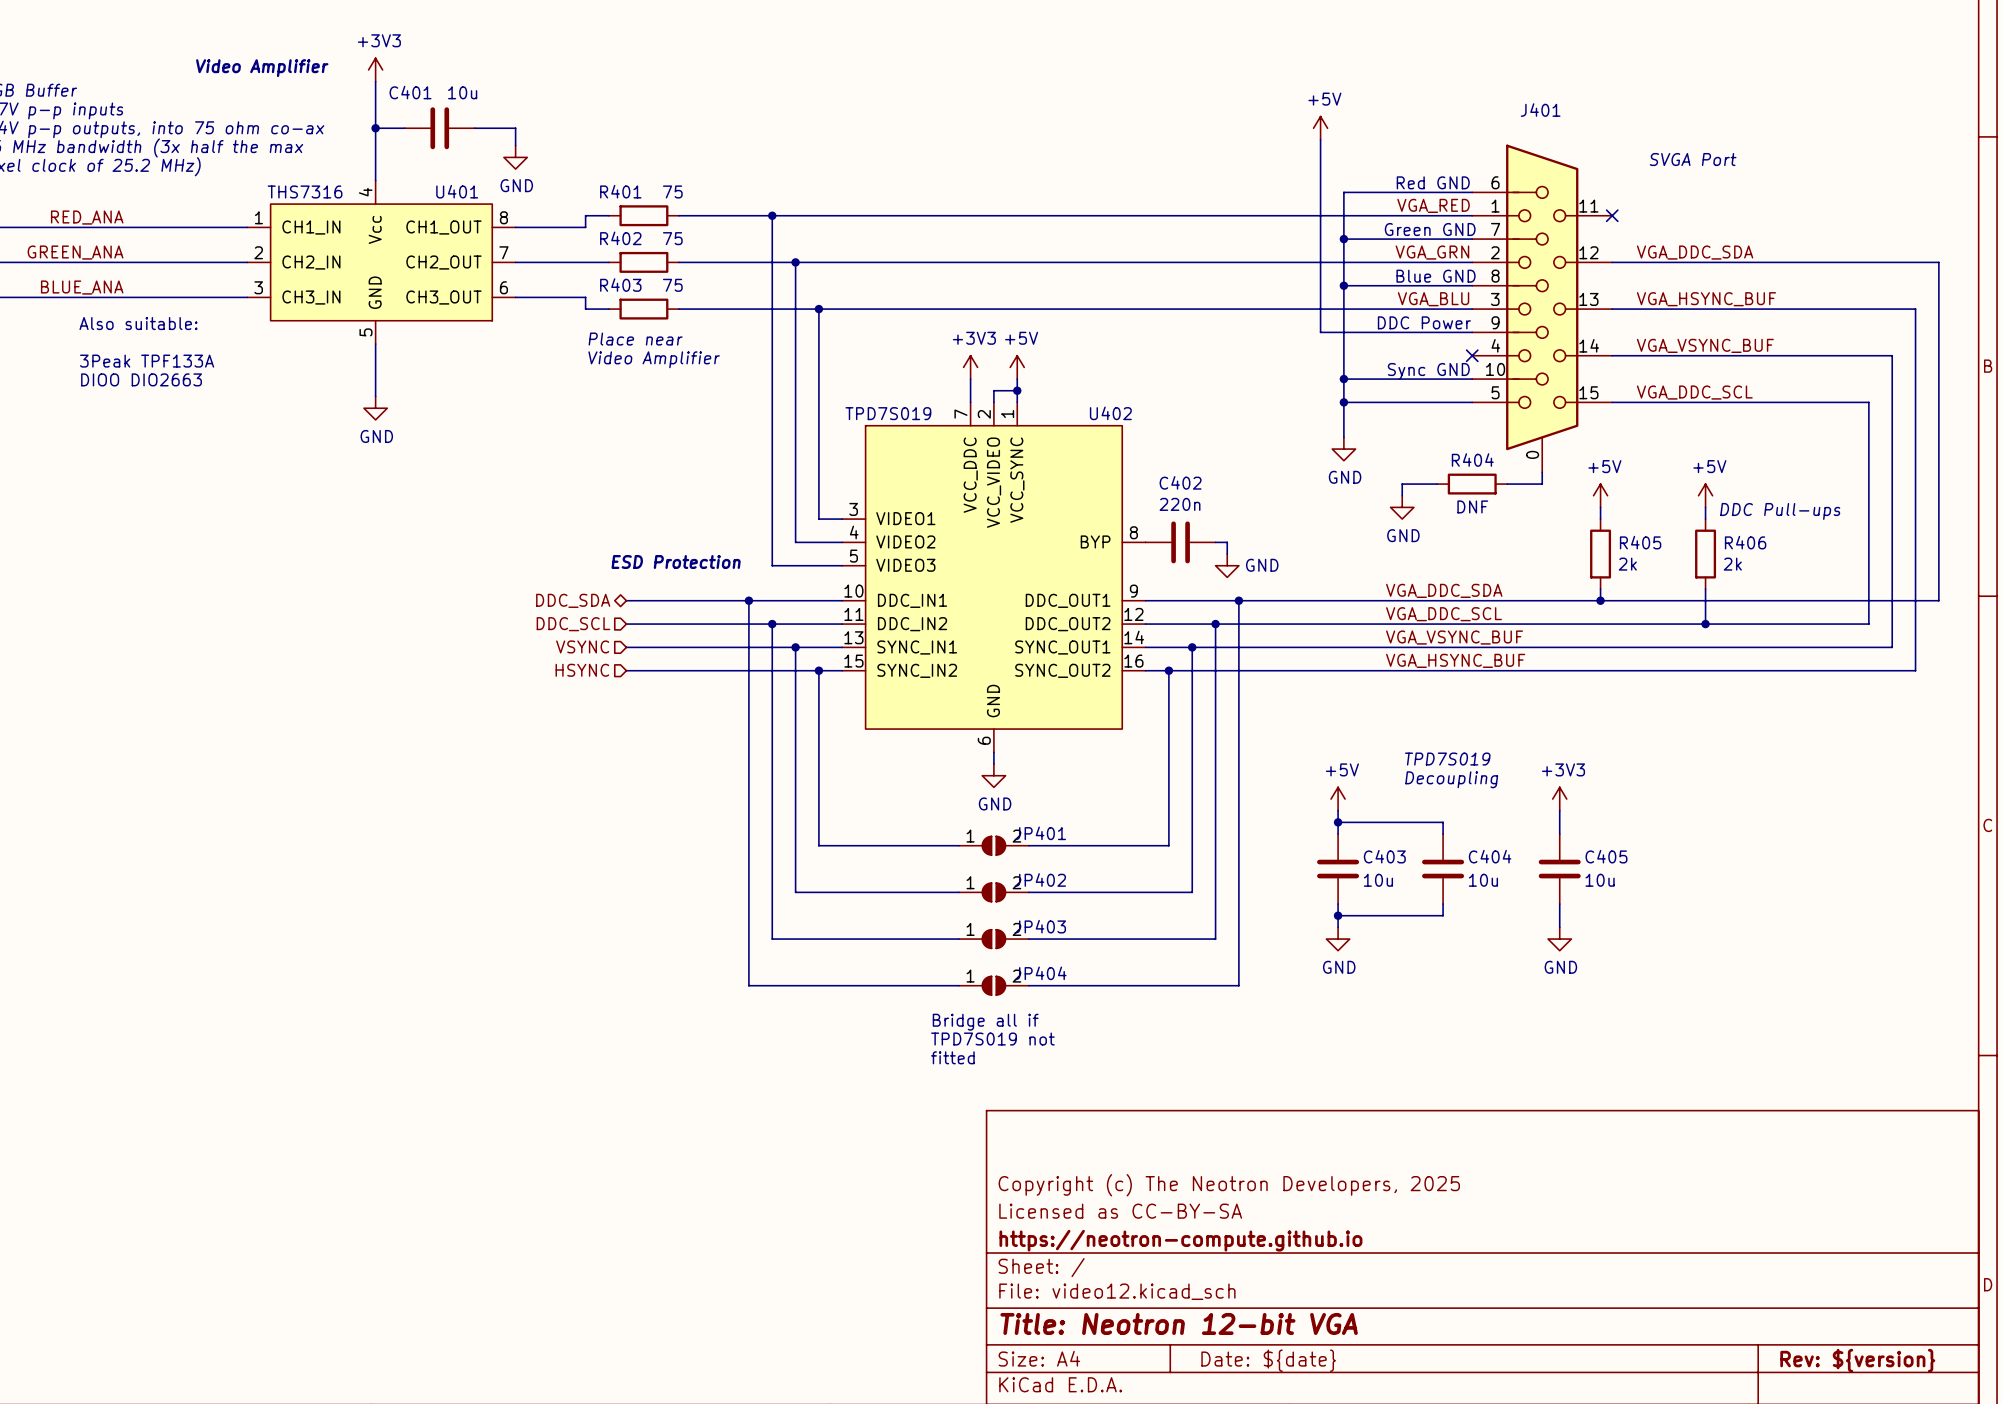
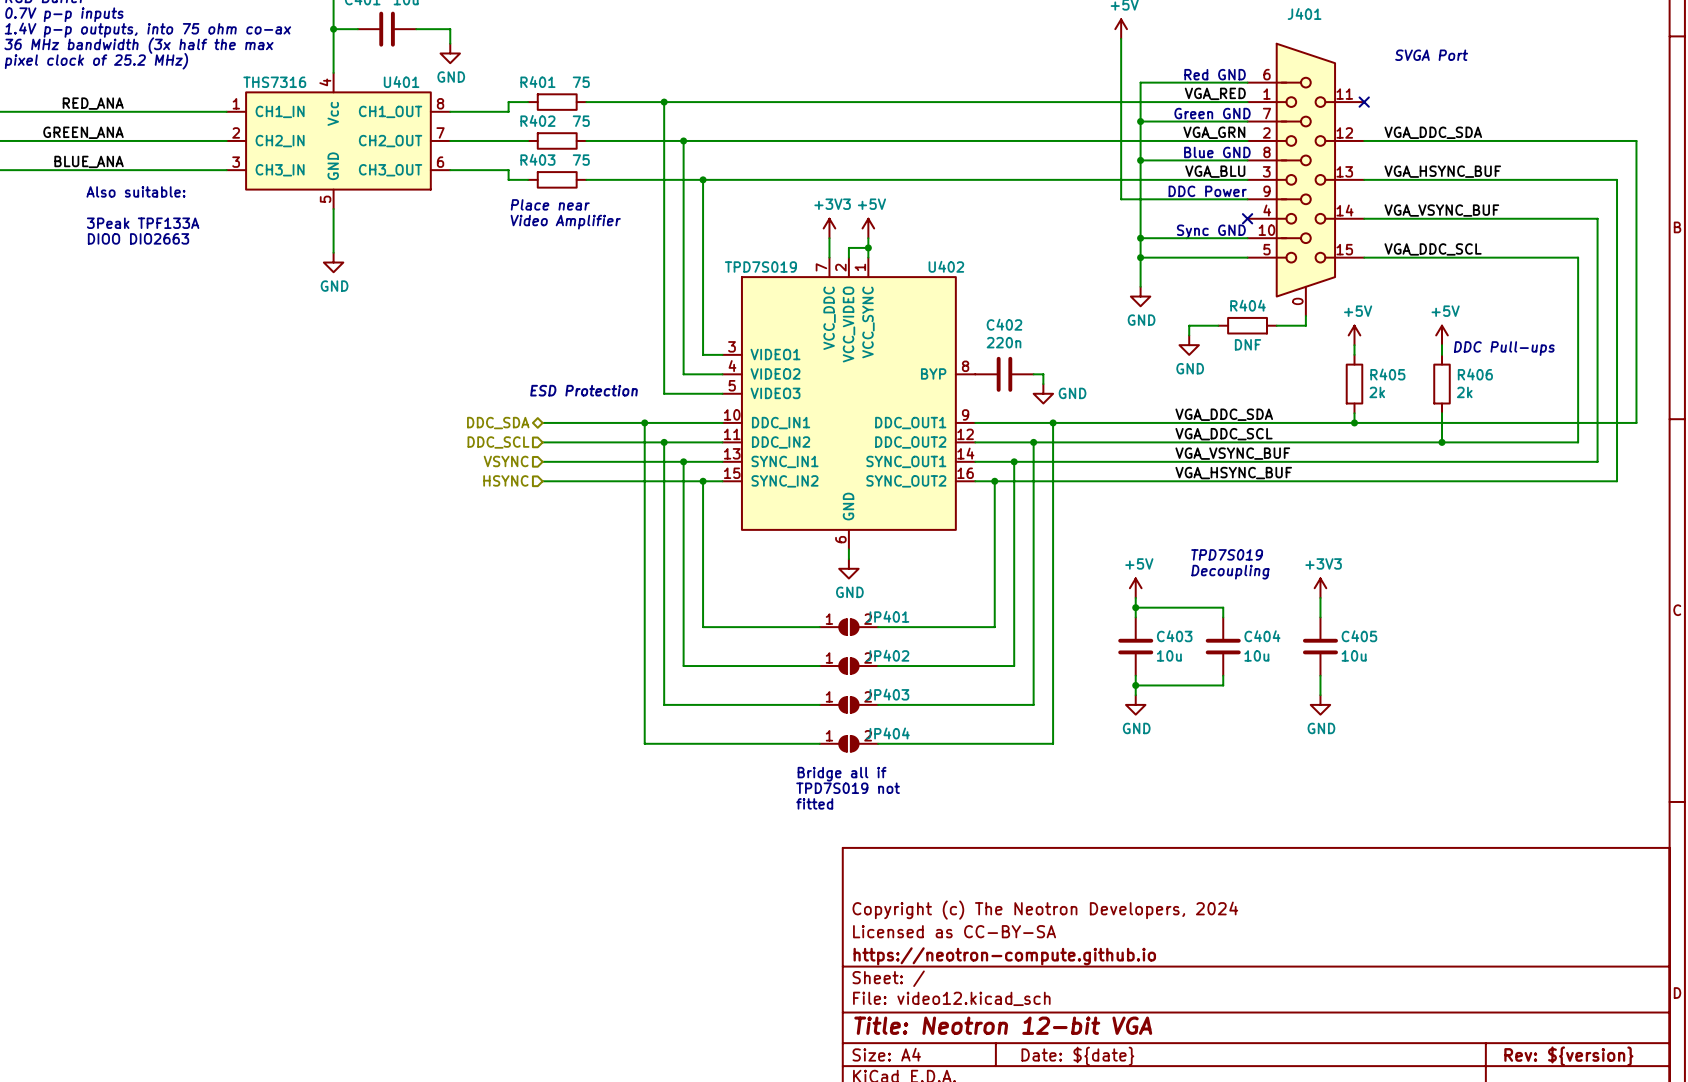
title block: Copyright (c) The Neotron Developers, 2025 (1229, 1185) -> Copyright (c) The Neotron Developers, 2024 (1045, 910)

